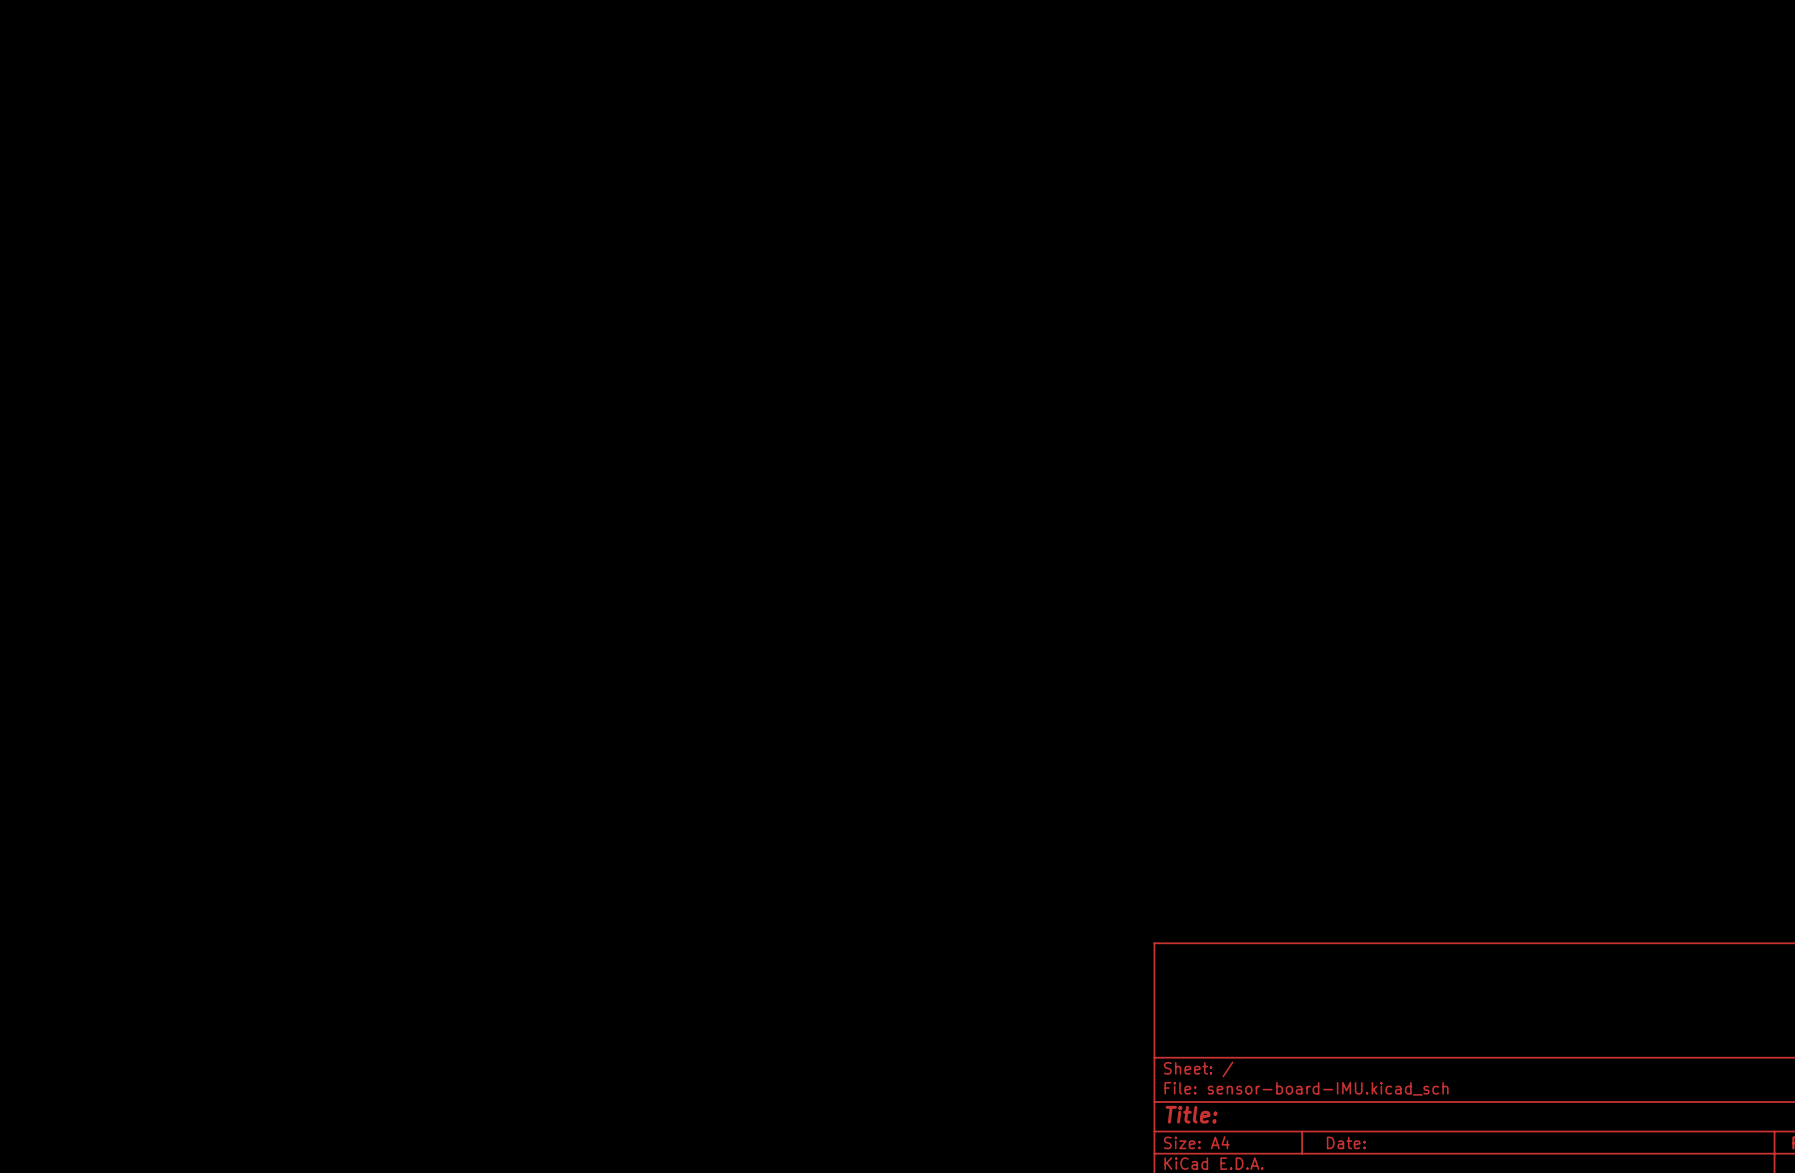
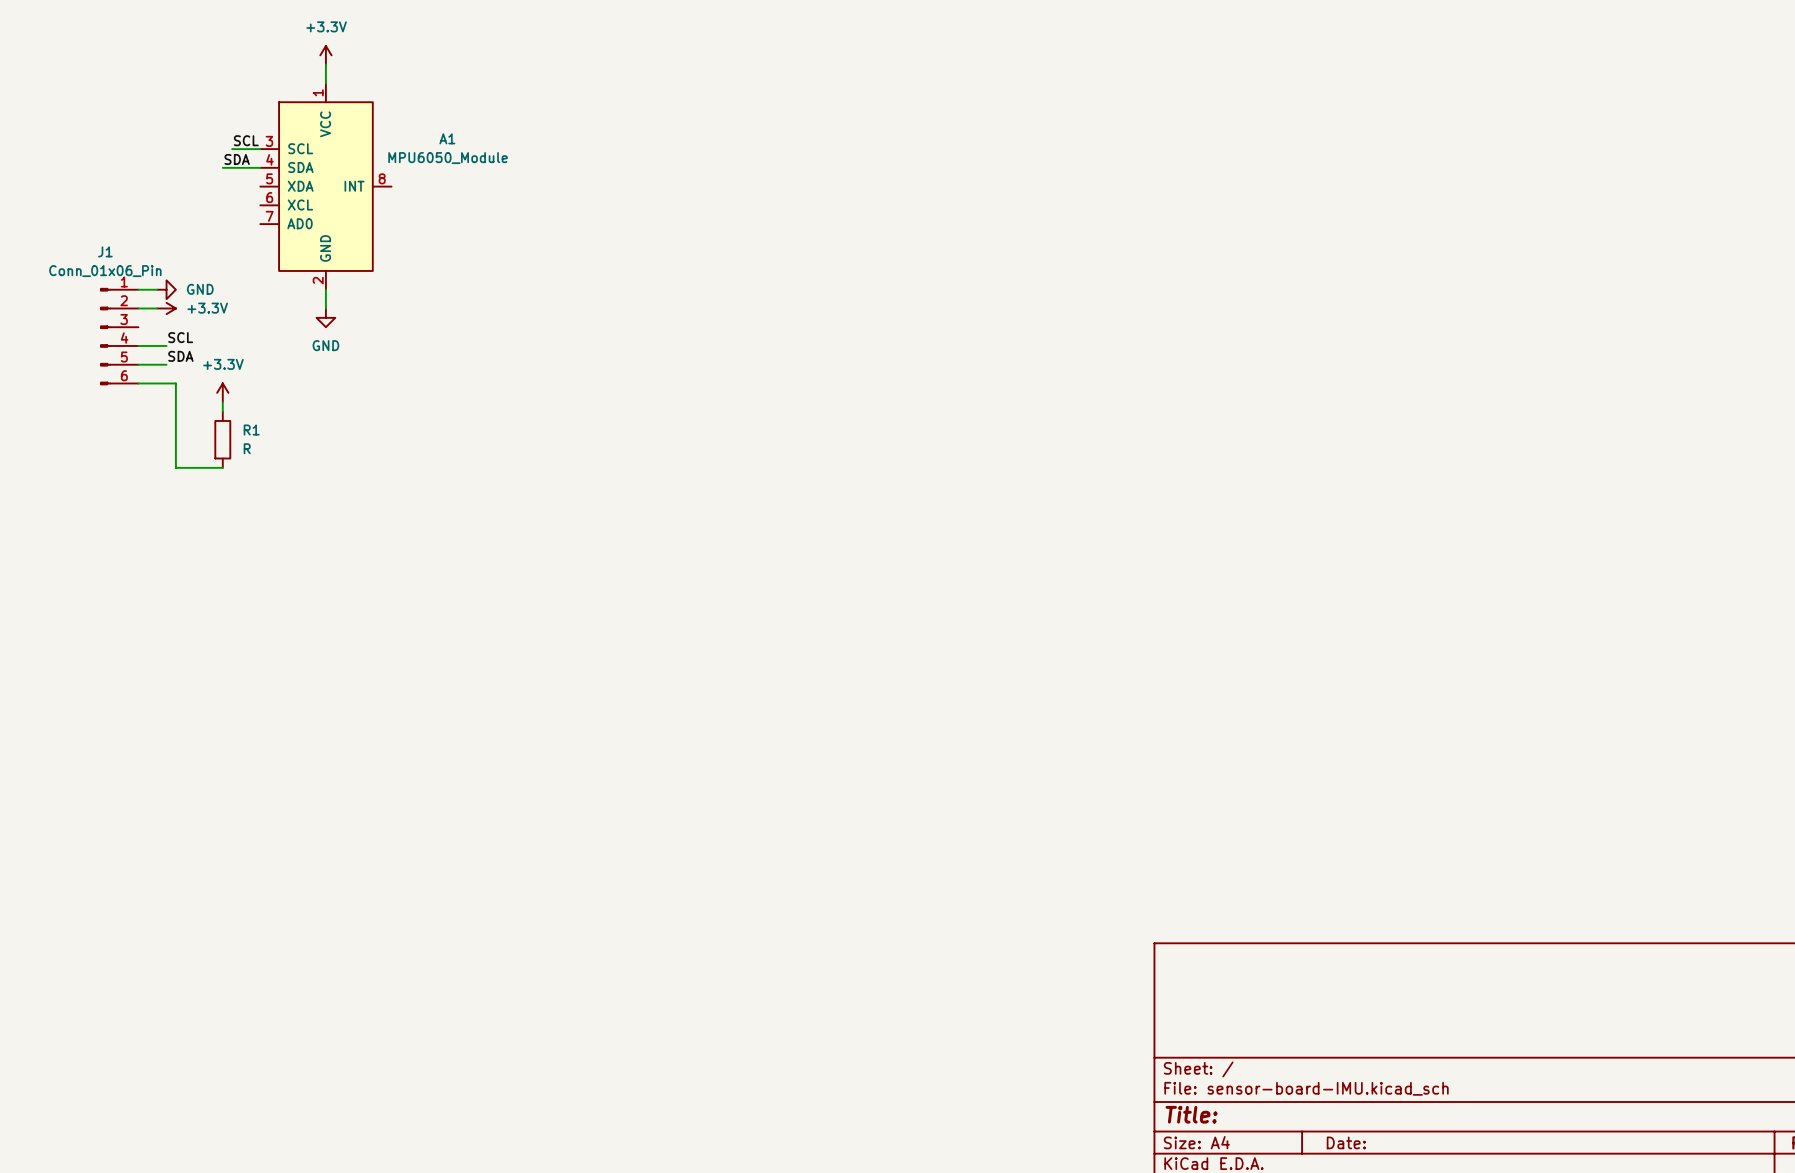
power symbol: none -> +3.3V (325, 55)
wire: none -> (325, 64) (325, 83)
label: none -> SCL (246, 140)
wire: none -> (232, 149) (260, 149)
label: none -> SDA (237, 159)
wire: none -> (222, 167) (260, 167)
A1: none -> MPU6050_Module (325, 186)
wire: none -> (138, 289) (157, 289)
power symbol: none -> GND (166, 289)
wire: none -> (325, 289) (325, 308)
wire: none -> (138, 308) (157, 308)
power symbol: none -> +3.3V (166, 308)
power symbol: none -> GND (325, 317)
J1: none -> Conn_01x06_Pin (119, 336)
label: none -> SCL (180, 337)
wire: none -> (138, 345) (166, 345)
label: none -> SDA (180, 356)
wire: none -> (138, 364) (166, 364)
wire: none -> (138, 383) (175, 383) (175, 467) (222, 467)
power symbol: none -> +3.3V (222, 392)
wire: none -> (222, 402) (222, 411)
R1: none -> R (222, 439)

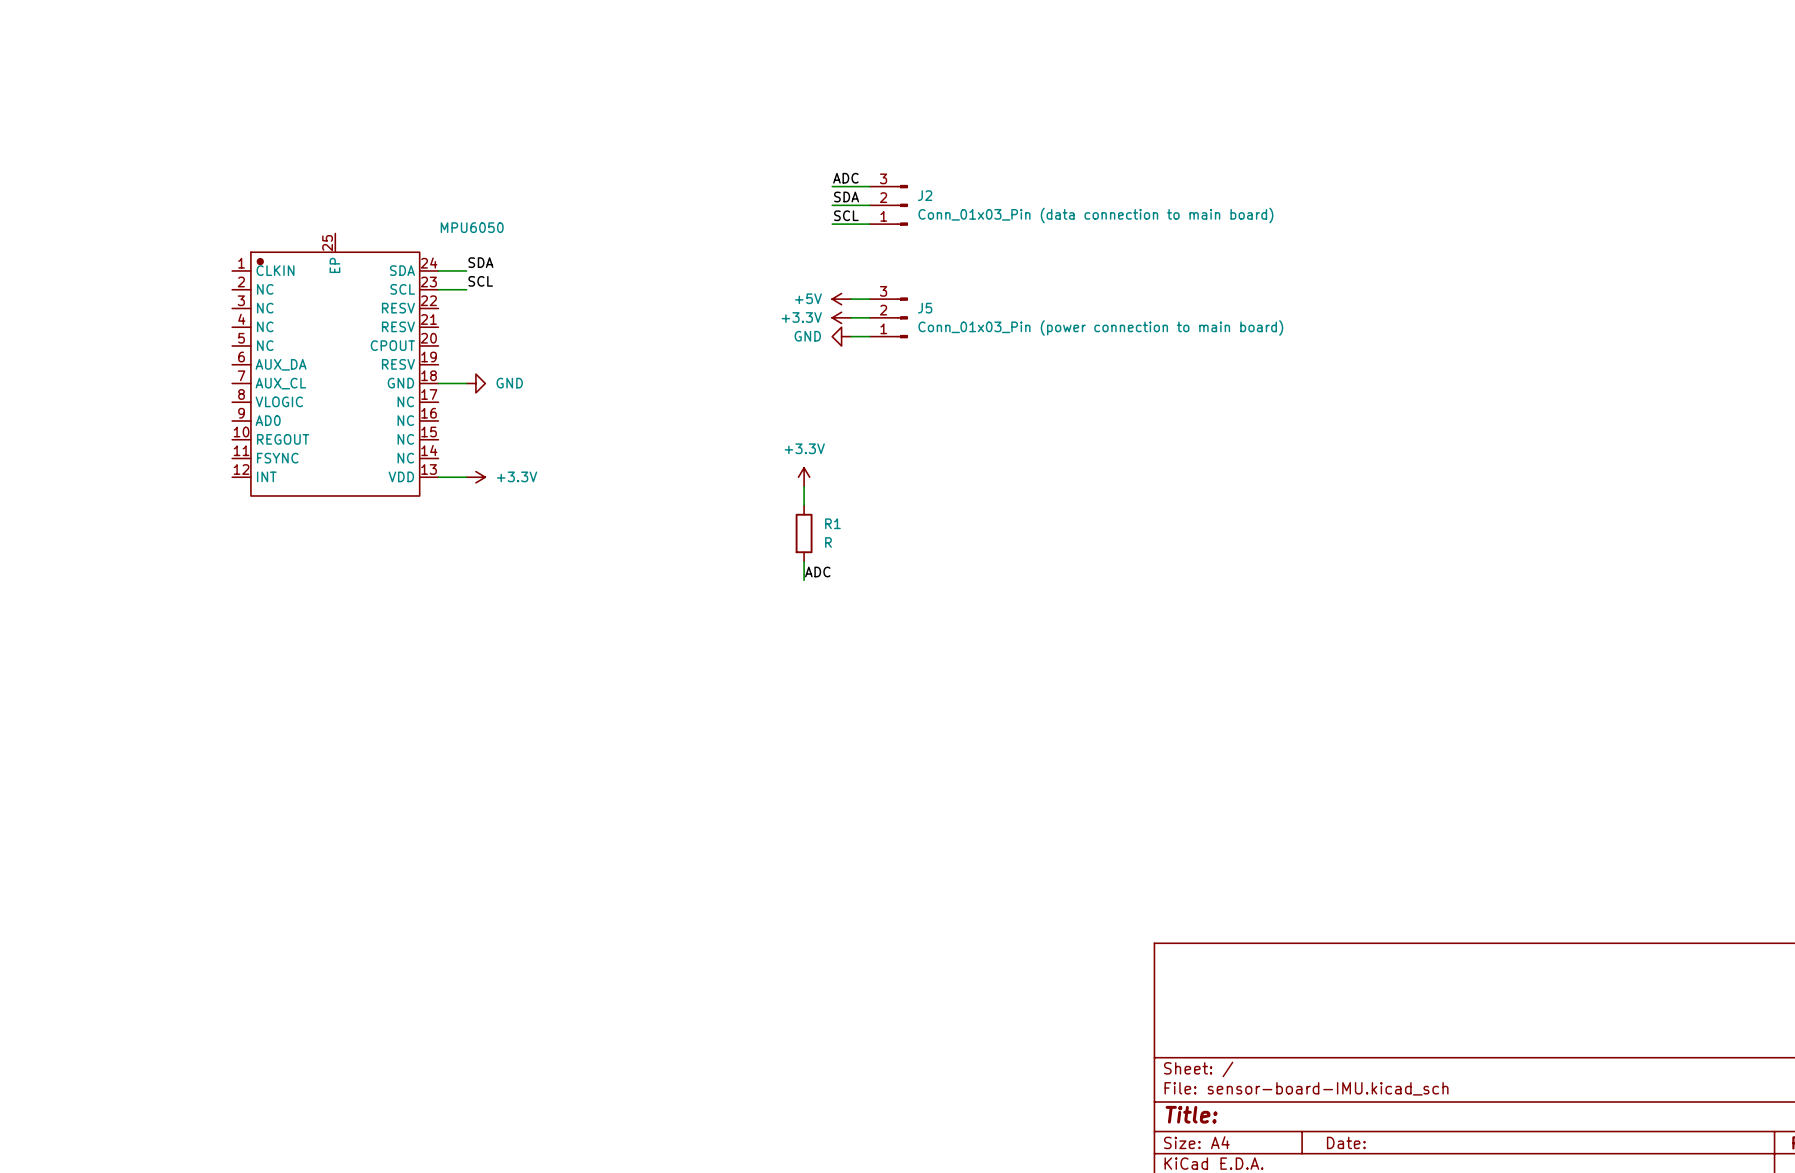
power symbol: +3.3V (325, 55) -> none
wire: (325, 64) (325, 83) -> none
label: SCL (246, 140) -> none
wire: (232, 149) (260, 149) -> none
label: SDA (237, 159) -> none
wire: (222, 167) (260, 167) -> none
label: none -> ADC (845, 178)
A1: MPU6050_Module (325, 186) -> none
wire: none -> (832, 186) (869, 186)
label: none -> SDA (846, 196)
wire: none -> (832, 205) (869, 205)
J2: none -> Conn_01x03_Pin (data connection to main board) (888, 205)
label: none -> SCL (846, 215)
wire: none -> (832, 224) (869, 224)
label: none -> SDA (480, 262)
wire: none -> (438, 270) (466, 270)
label: none -> SCL (480, 281)
wire: (138, 289) (157, 289) -> none
power symbol: GND (166, 289) -> none
wire: (325, 289) (325, 308) -> none
wire: none -> (438, 289) (466, 289)
power symbol: none -> +5V (841, 299)
wire: none -> (850, 299) (869, 299)
wire: (138, 308) (157, 308) -> none
power symbol: +3.3V (166, 308) -> none
power symbol: GND (325, 317) -> none
power symbol: none -> +3.3V (841, 317)
wire: none -> (850, 317) (869, 317)
J5: none -> Conn_01x03_Pin (power connection to main board) (888, 317)
J1: Conn_01x06_Pin (119, 336) -> none
power symbol: none -> GND (841, 336)
wire: none -> (850, 336) (869, 336)
label: SCL (180, 337) -> none
wire: (138, 345) (166, 345) -> none
label: SDA (180, 356) -> none
wire: (138, 364) (166, 364) -> none
MPU6050: none -> (335, 364)
wire: (138, 383) (175, 383) (175, 467) (222, 467) -> none
wire: none -> (438, 383) (466, 383)
power symbol: none -> GND (475, 383)
power symbol: +3.3V (222, 392) -> none
wire: (222, 402) (222, 411) -> none
R1 position: (222, 439) -> (804, 533)
wire: none -> (438, 477) (466, 477)
power symbol: none -> +3.3V (475, 477)
power symbol: none -> +3.3V (804, 477)
wire: none -> (804, 486) (804, 505)
wire: none -> (804, 561) (804, 580)
label: none -> ADC (817, 572)

